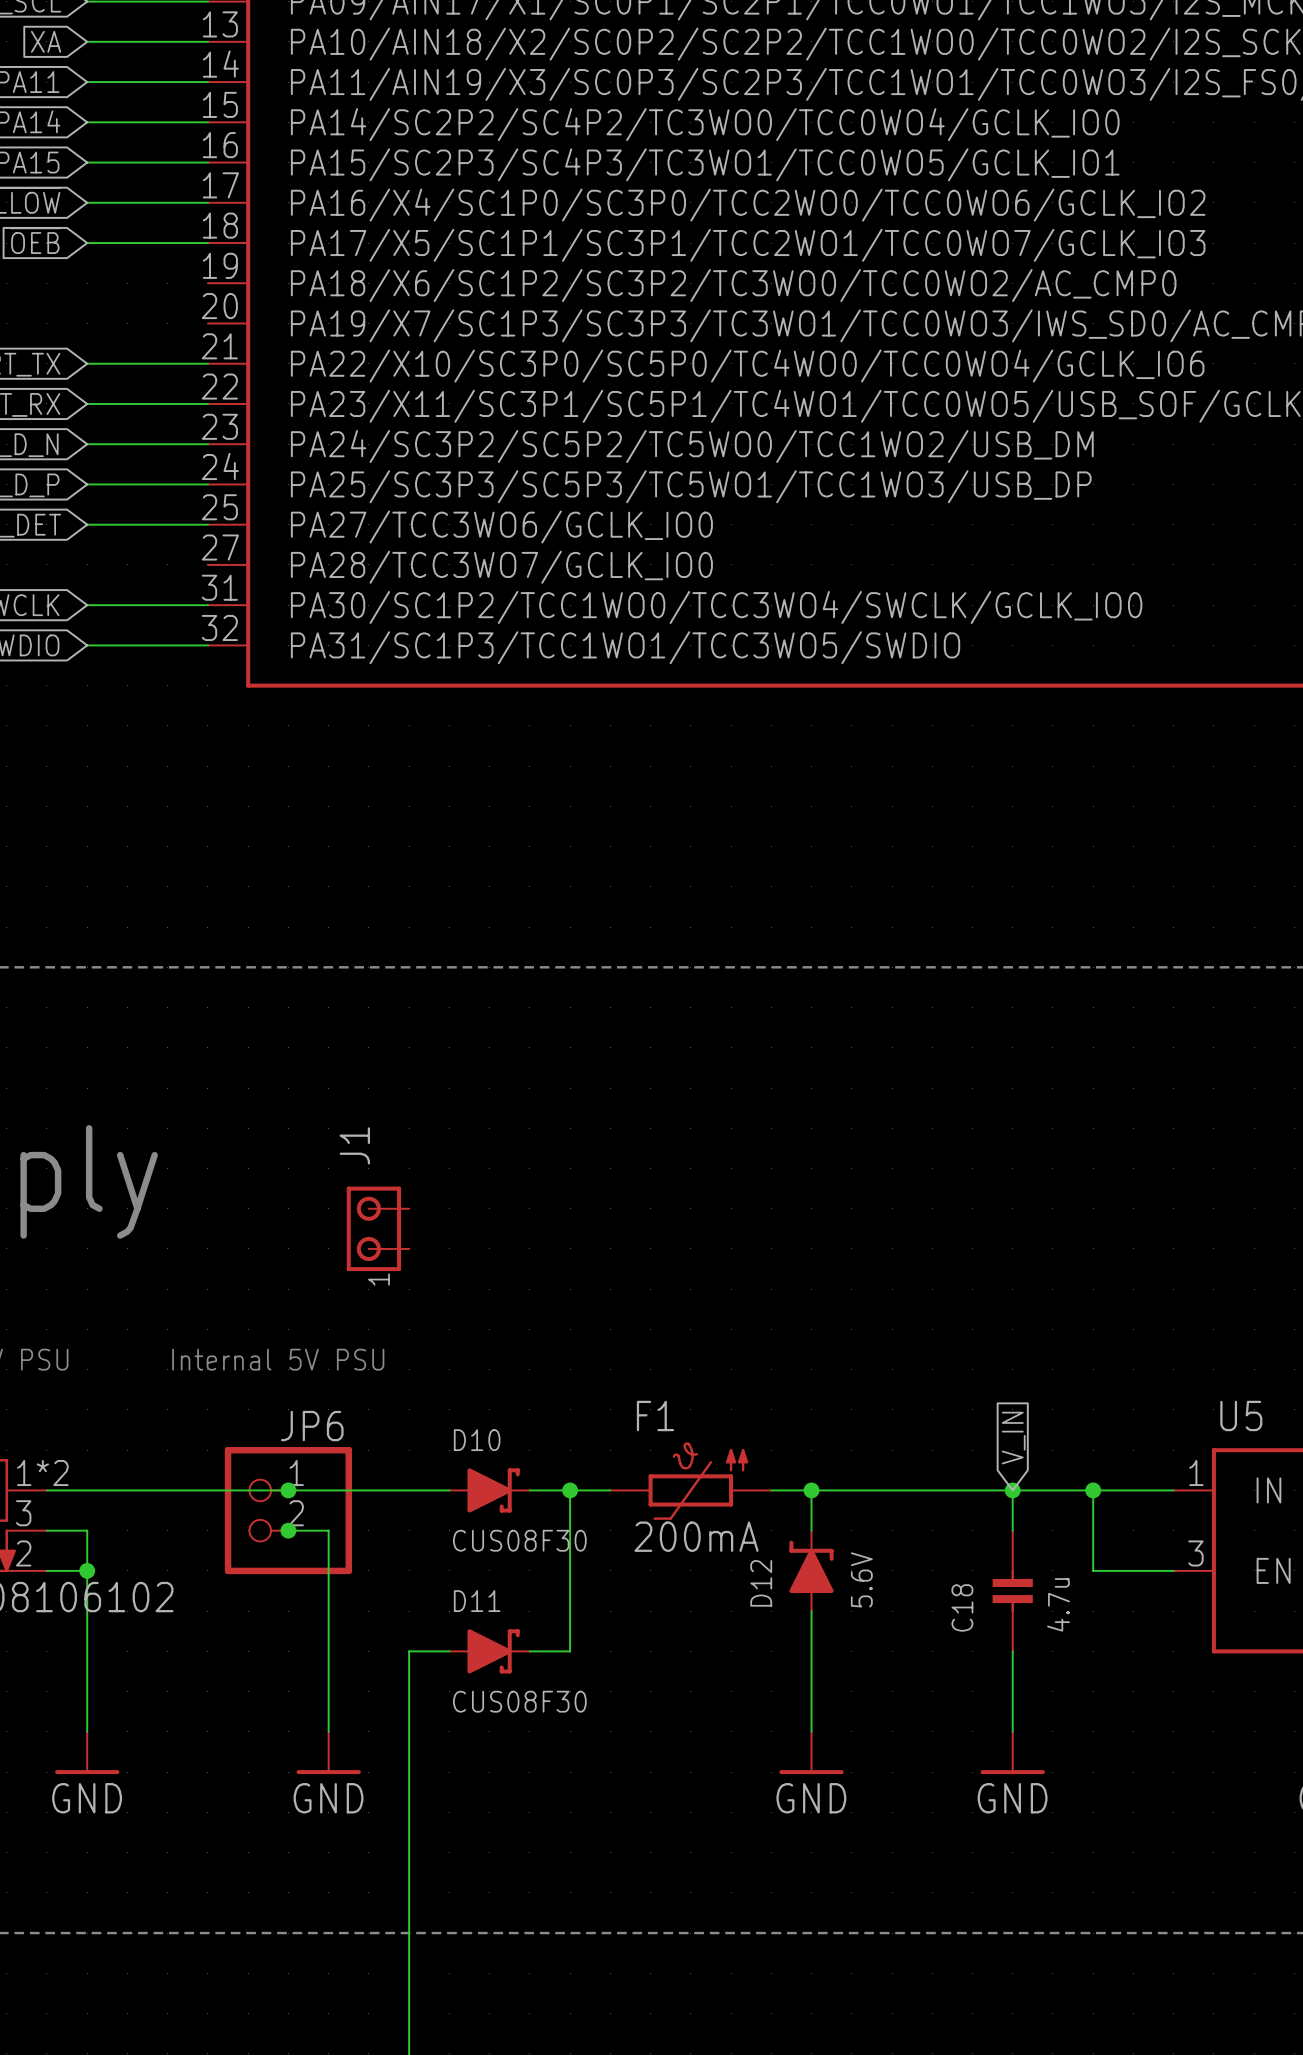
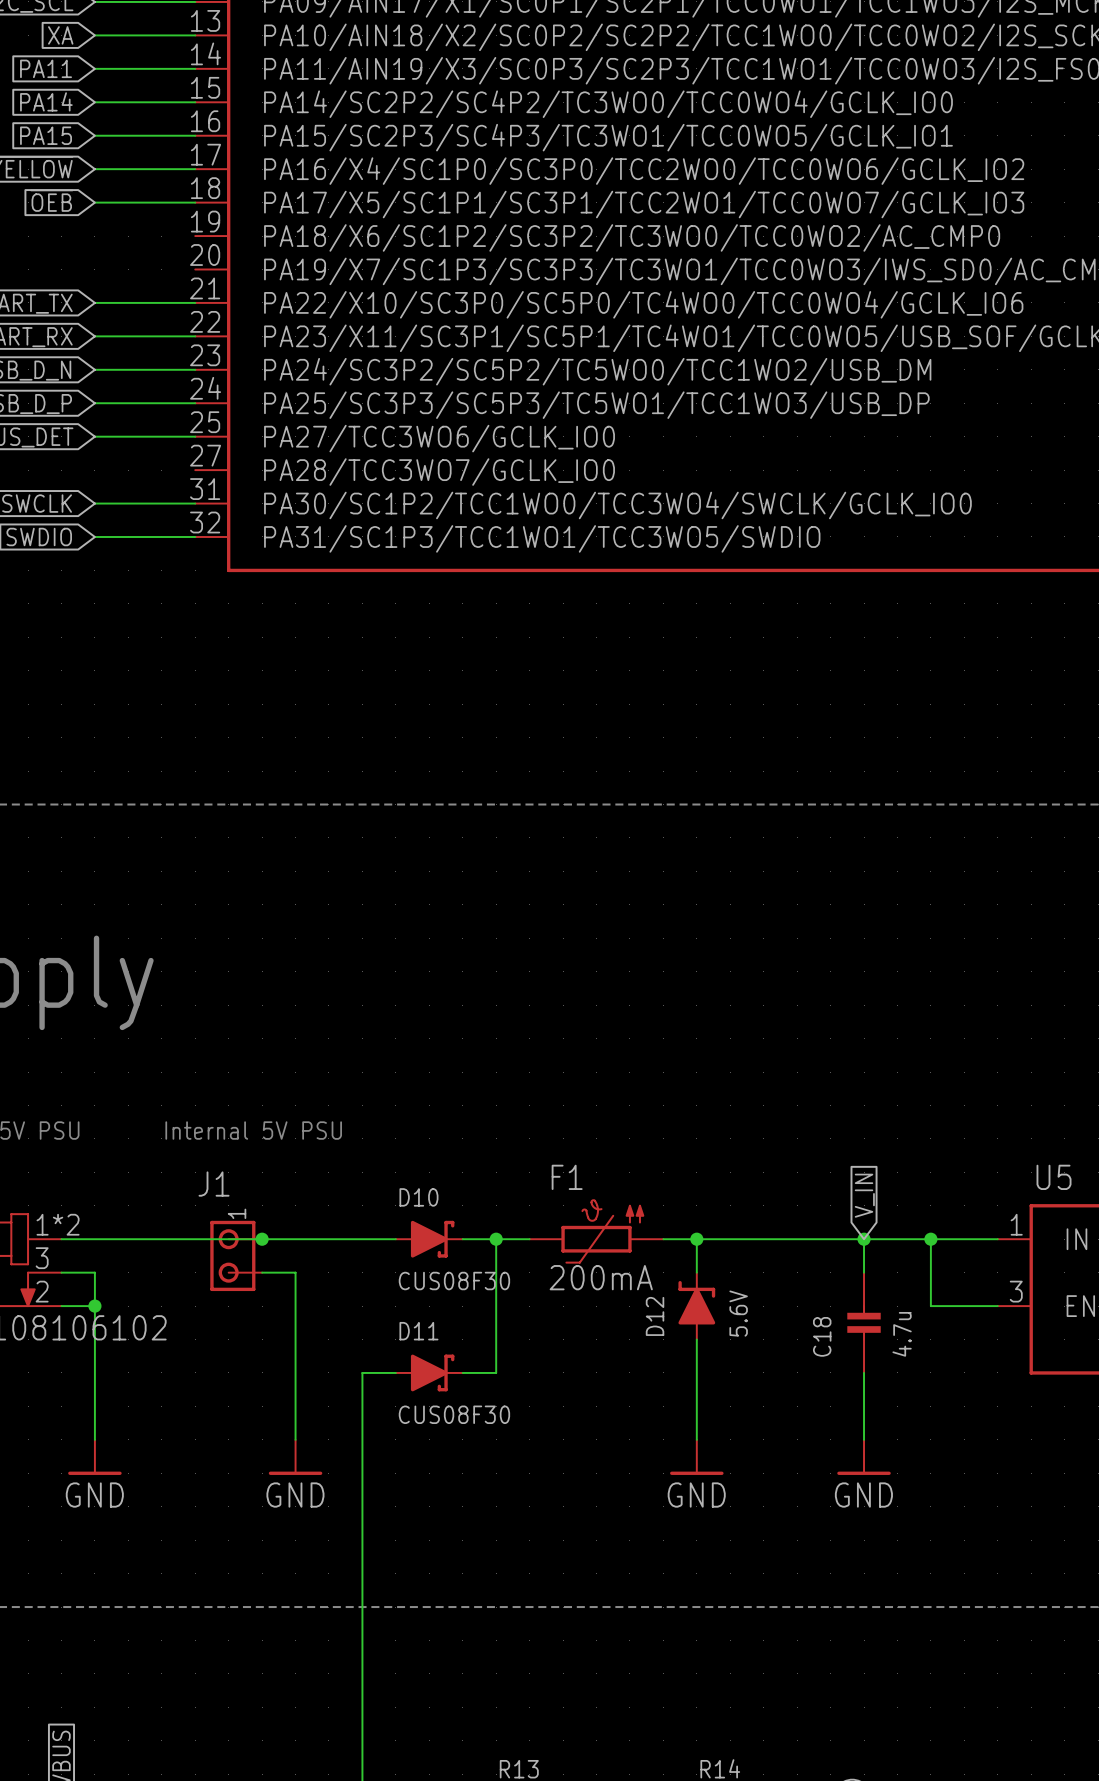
J1 flip: as is (373, 1228) -> up-down (232, 1255)
J1 position: (377, 1228) -> (236, 1255)
JP6: (288, 1510) -> none
junction: (288, 1530) -> none

